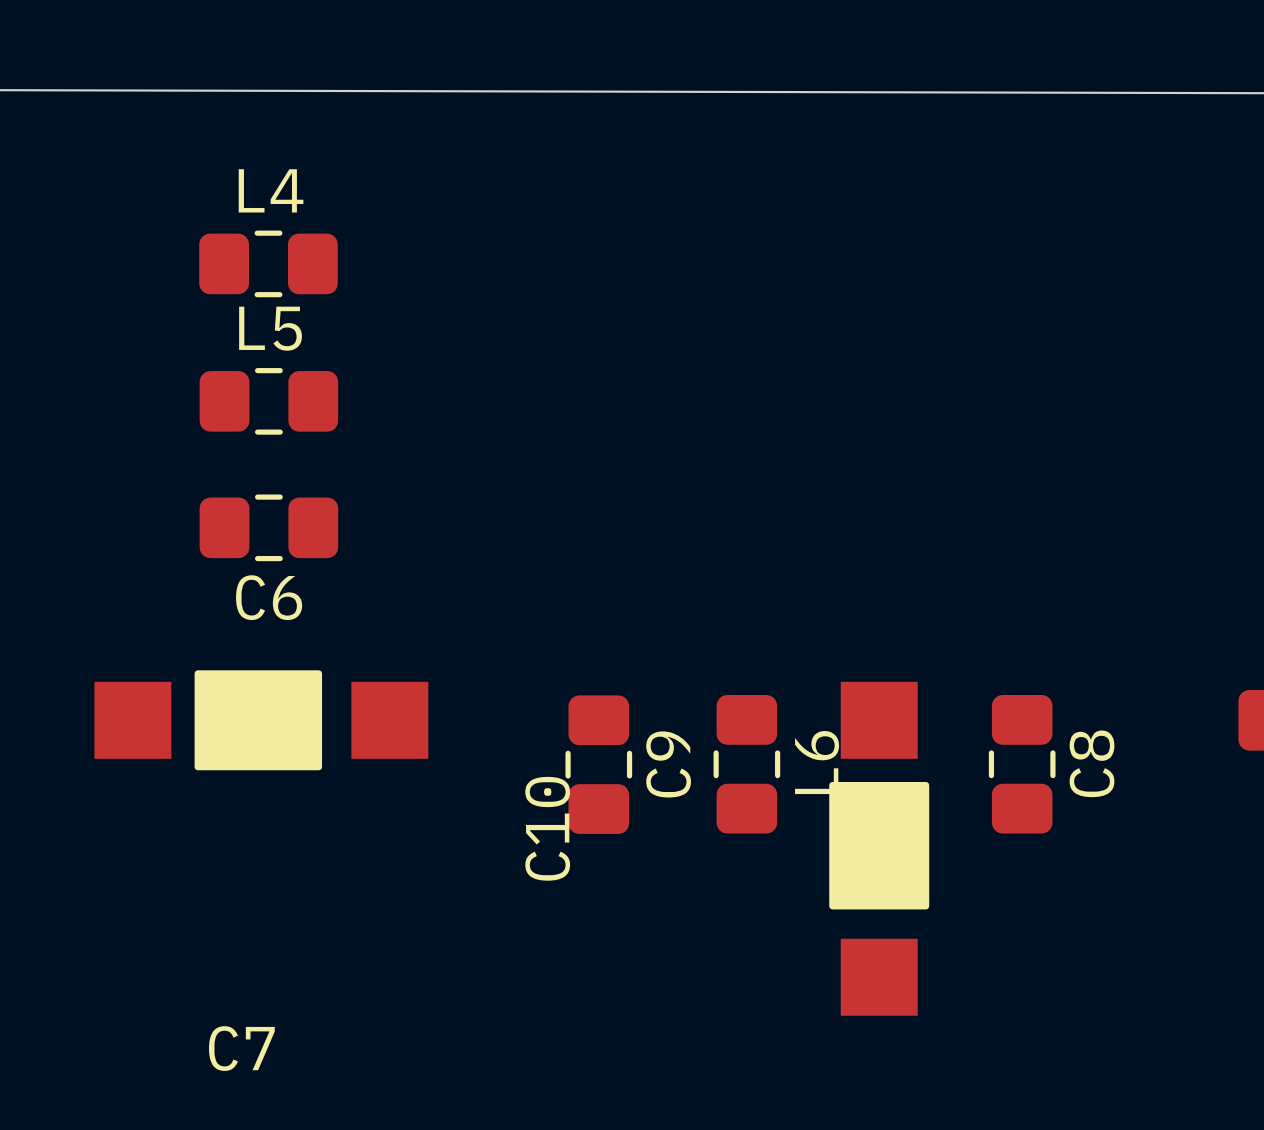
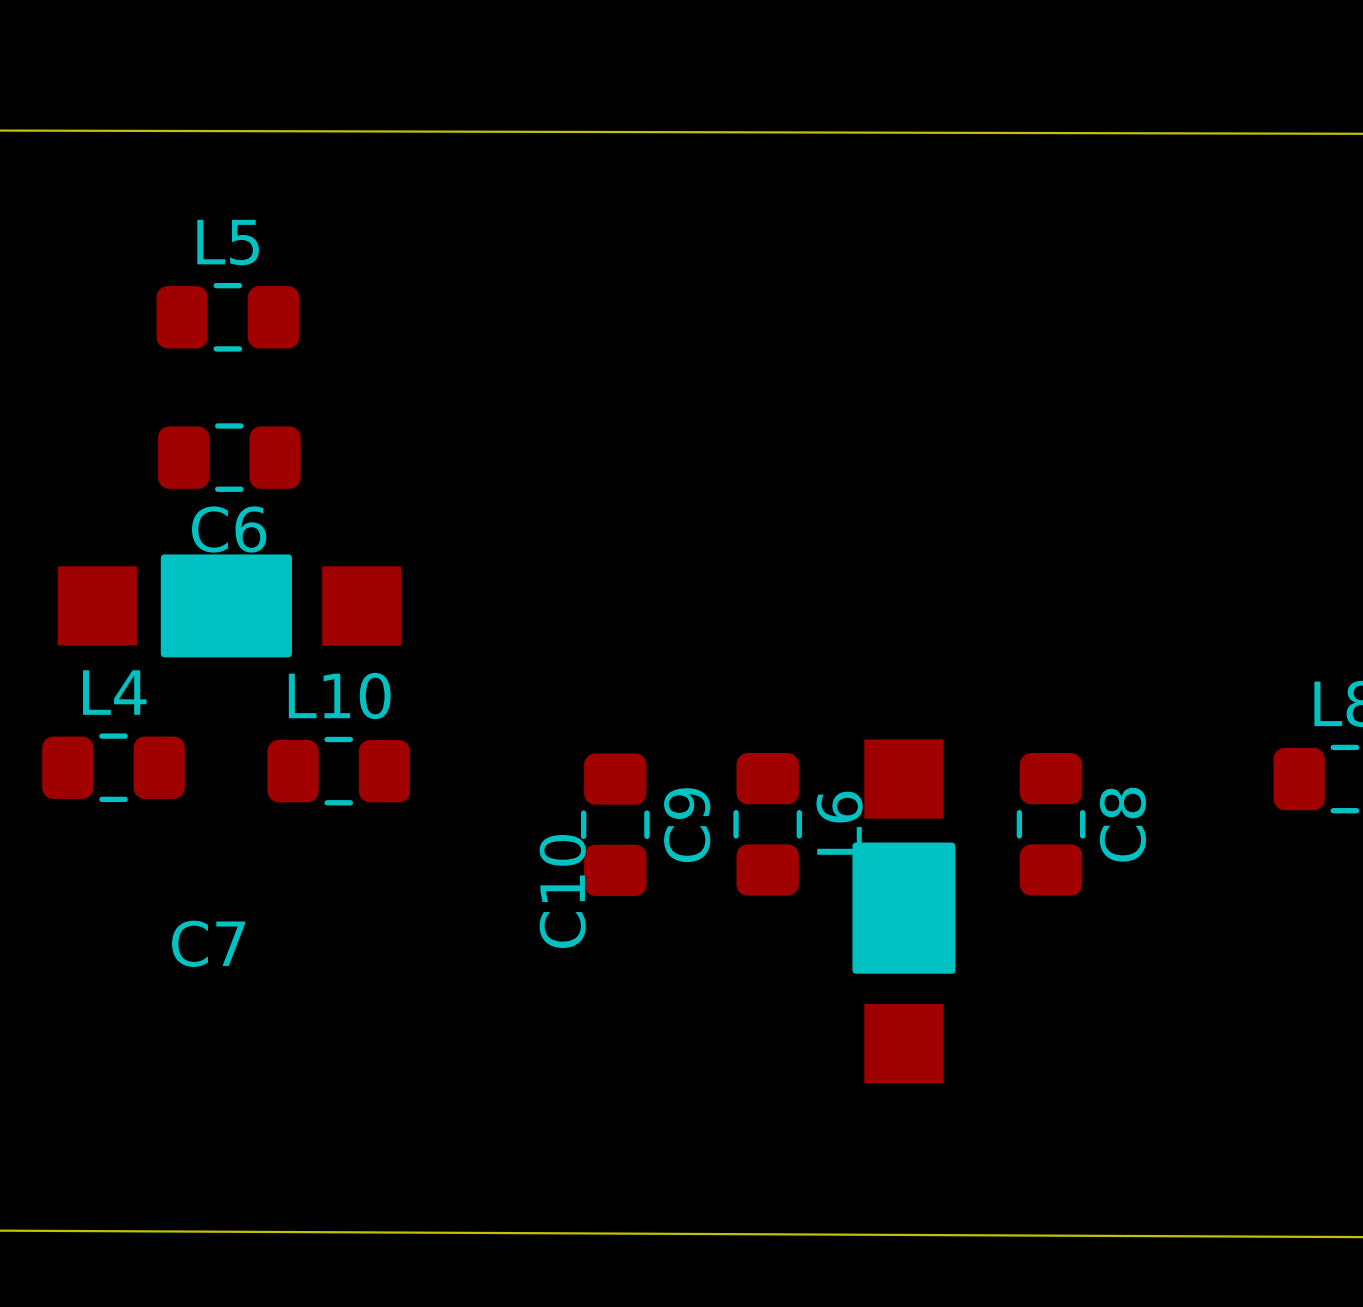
L4 position: (268, 263) -> (113, 767)
L5 position: (268, 401) -> (227, 317)
C6 position: (268, 527) -> (229, 457)
L10: none -> (338, 771)
C7 position: (261, 720) -> (229, 605)

